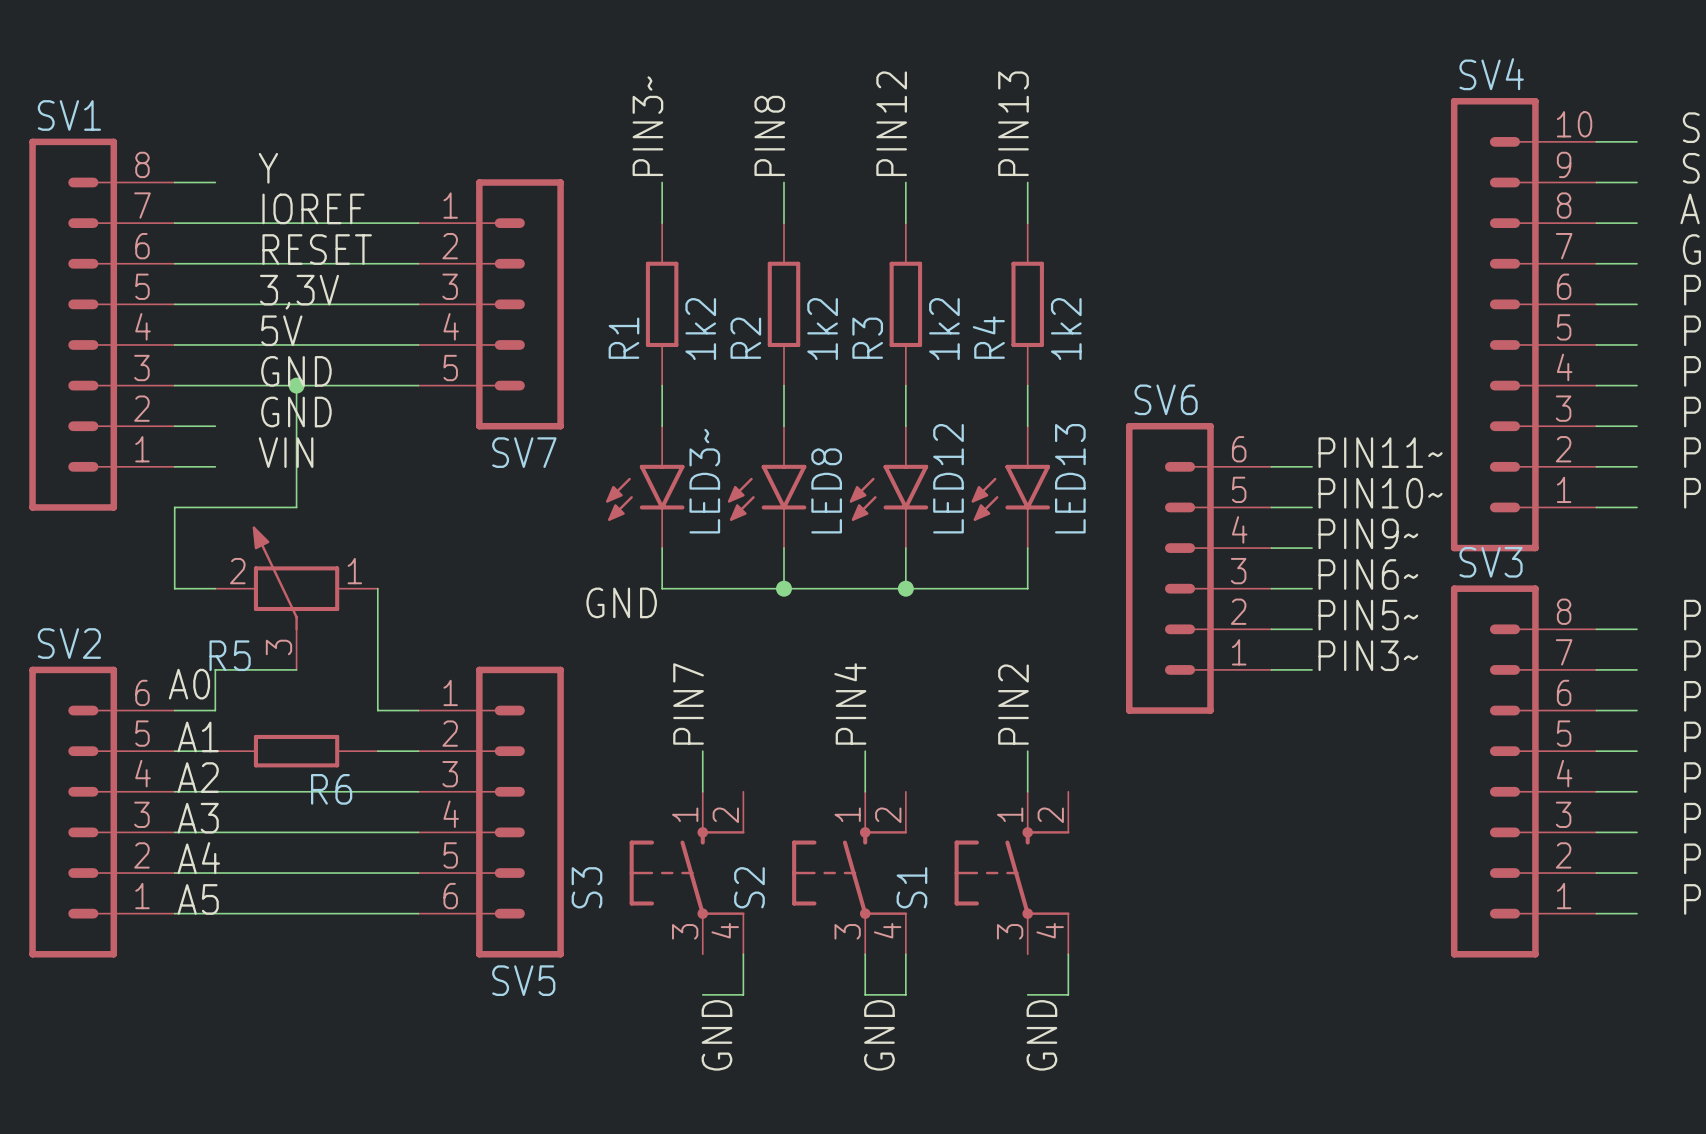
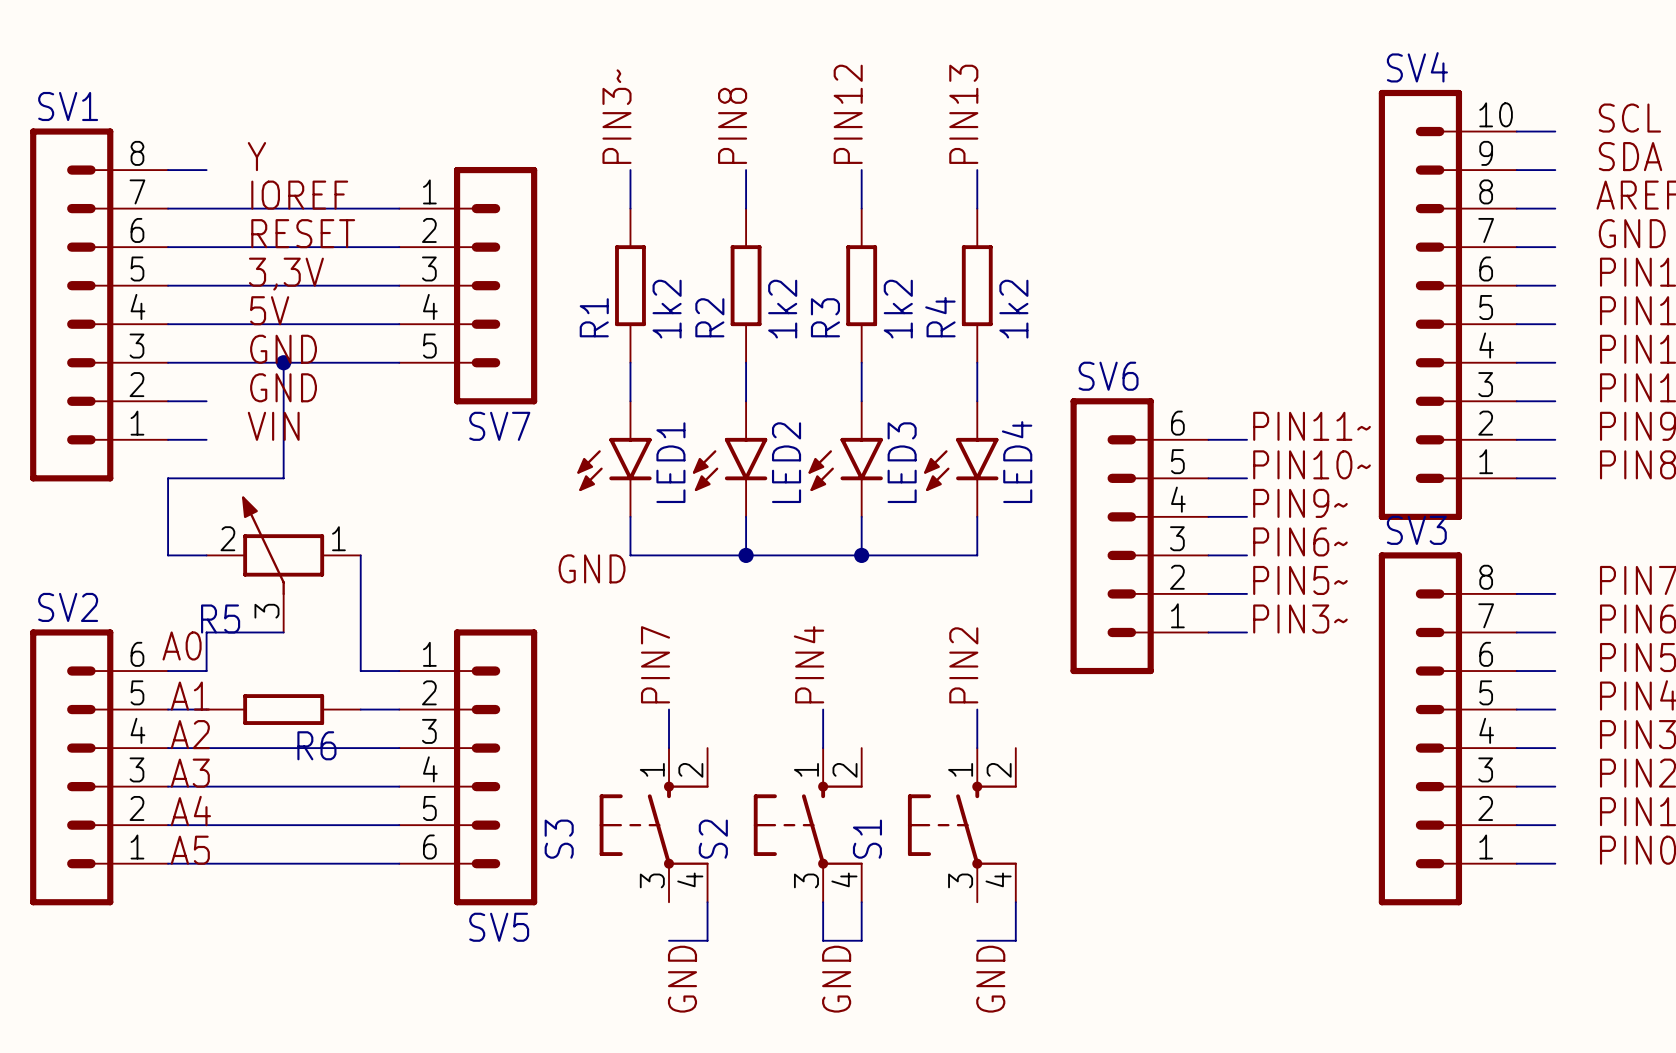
LED12 name: LED12 (948, 478) -> LED3 (902, 462)
LED13 name: LED13 (1070, 478) -> LED4 (1017, 462)
LED3~ name: LED3~ (704, 481) -> LED1 (670, 462)
LED8 name: LED8 (826, 490) -> LED2 (786, 462)

